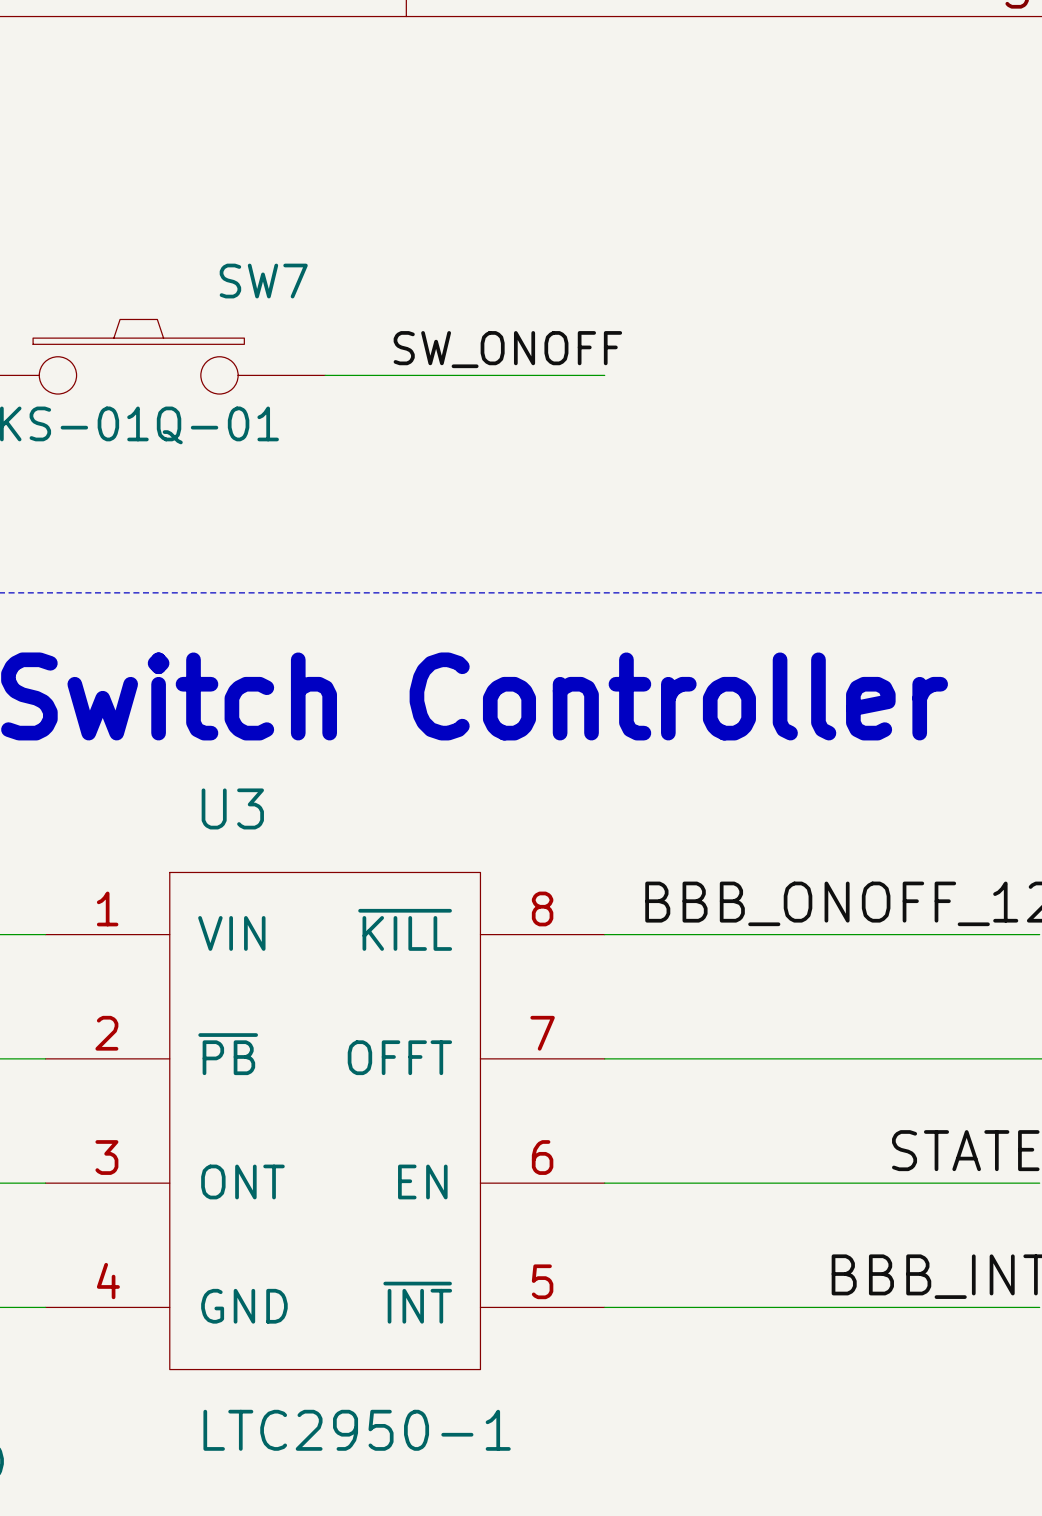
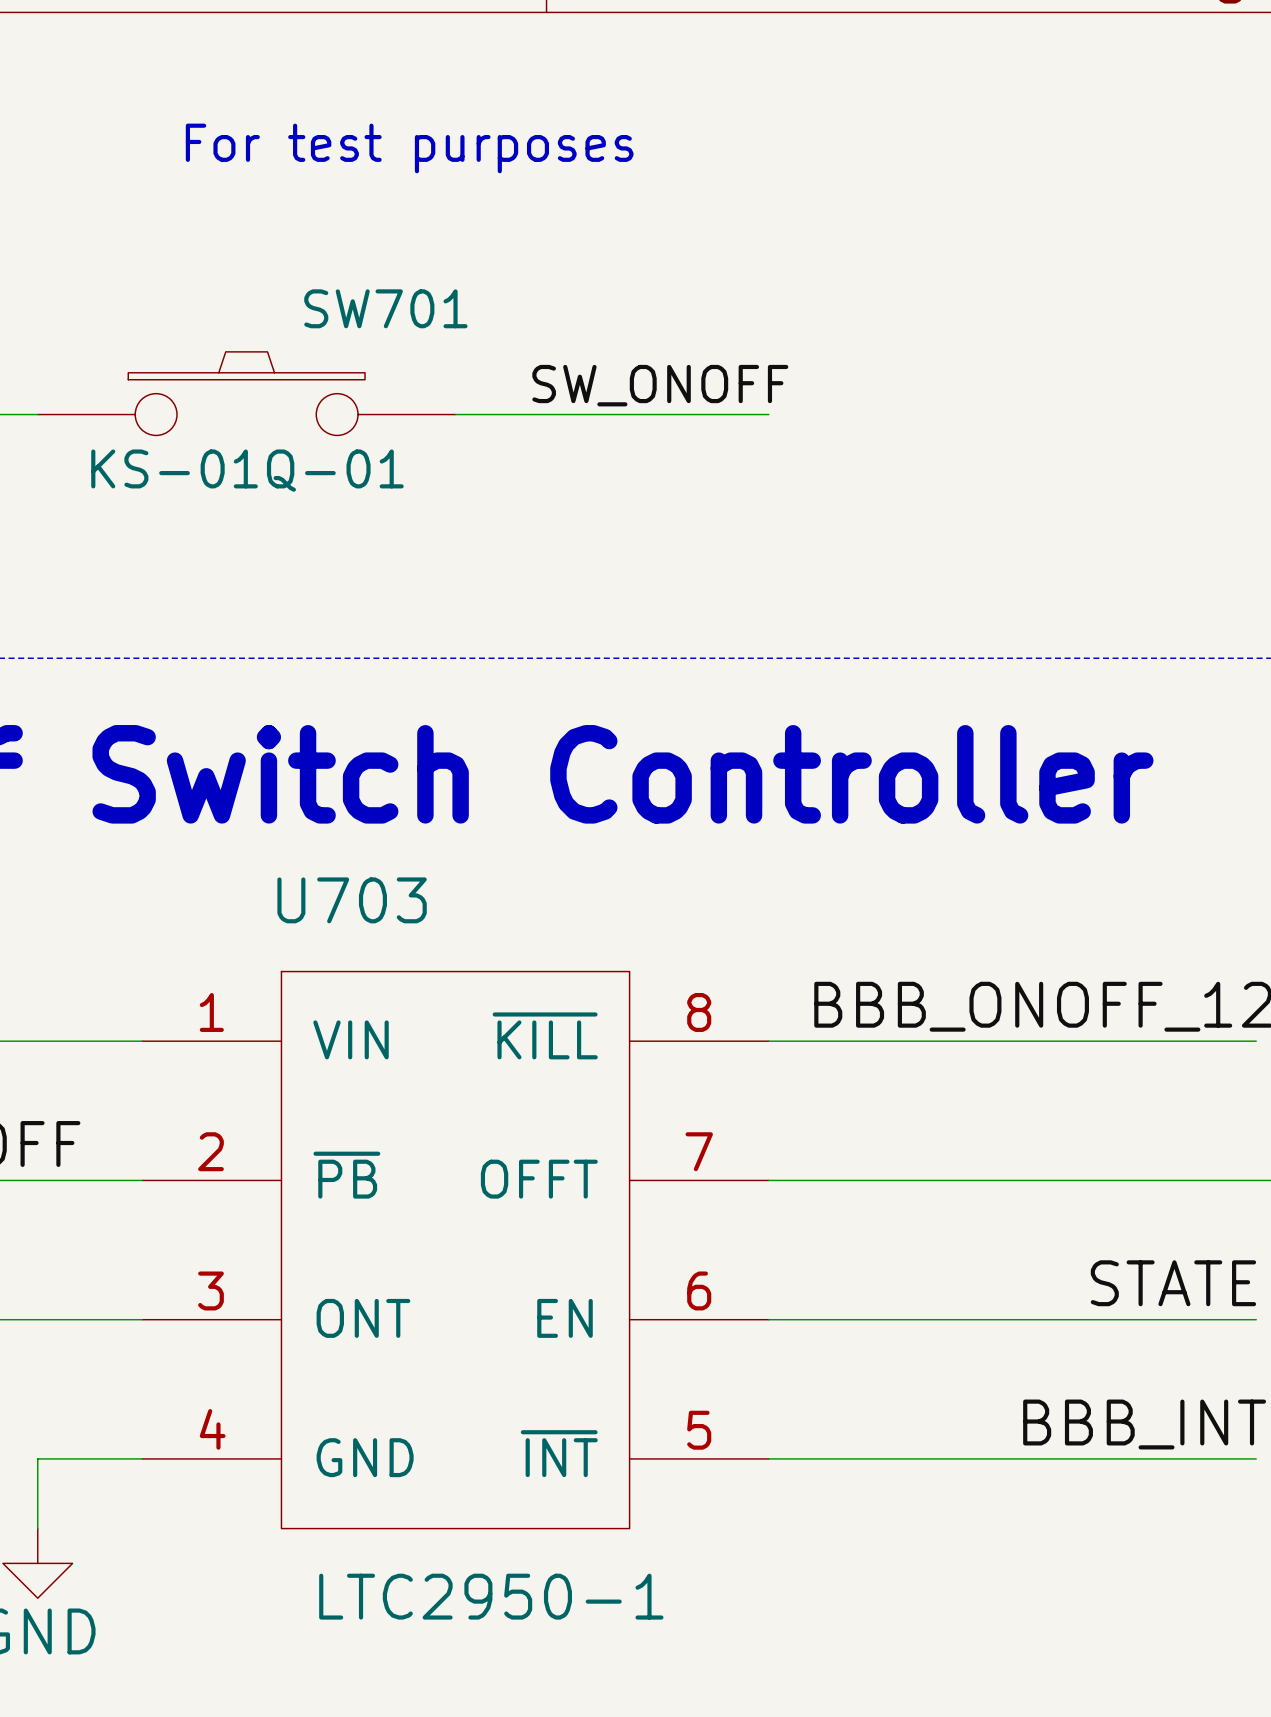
text: none -> For test purposes (409, 148)
SW7 name: SW7 (263, 281) -> SW701 (385, 308)
U3 name: U3 (232, 808) -> U703 (352, 900)

